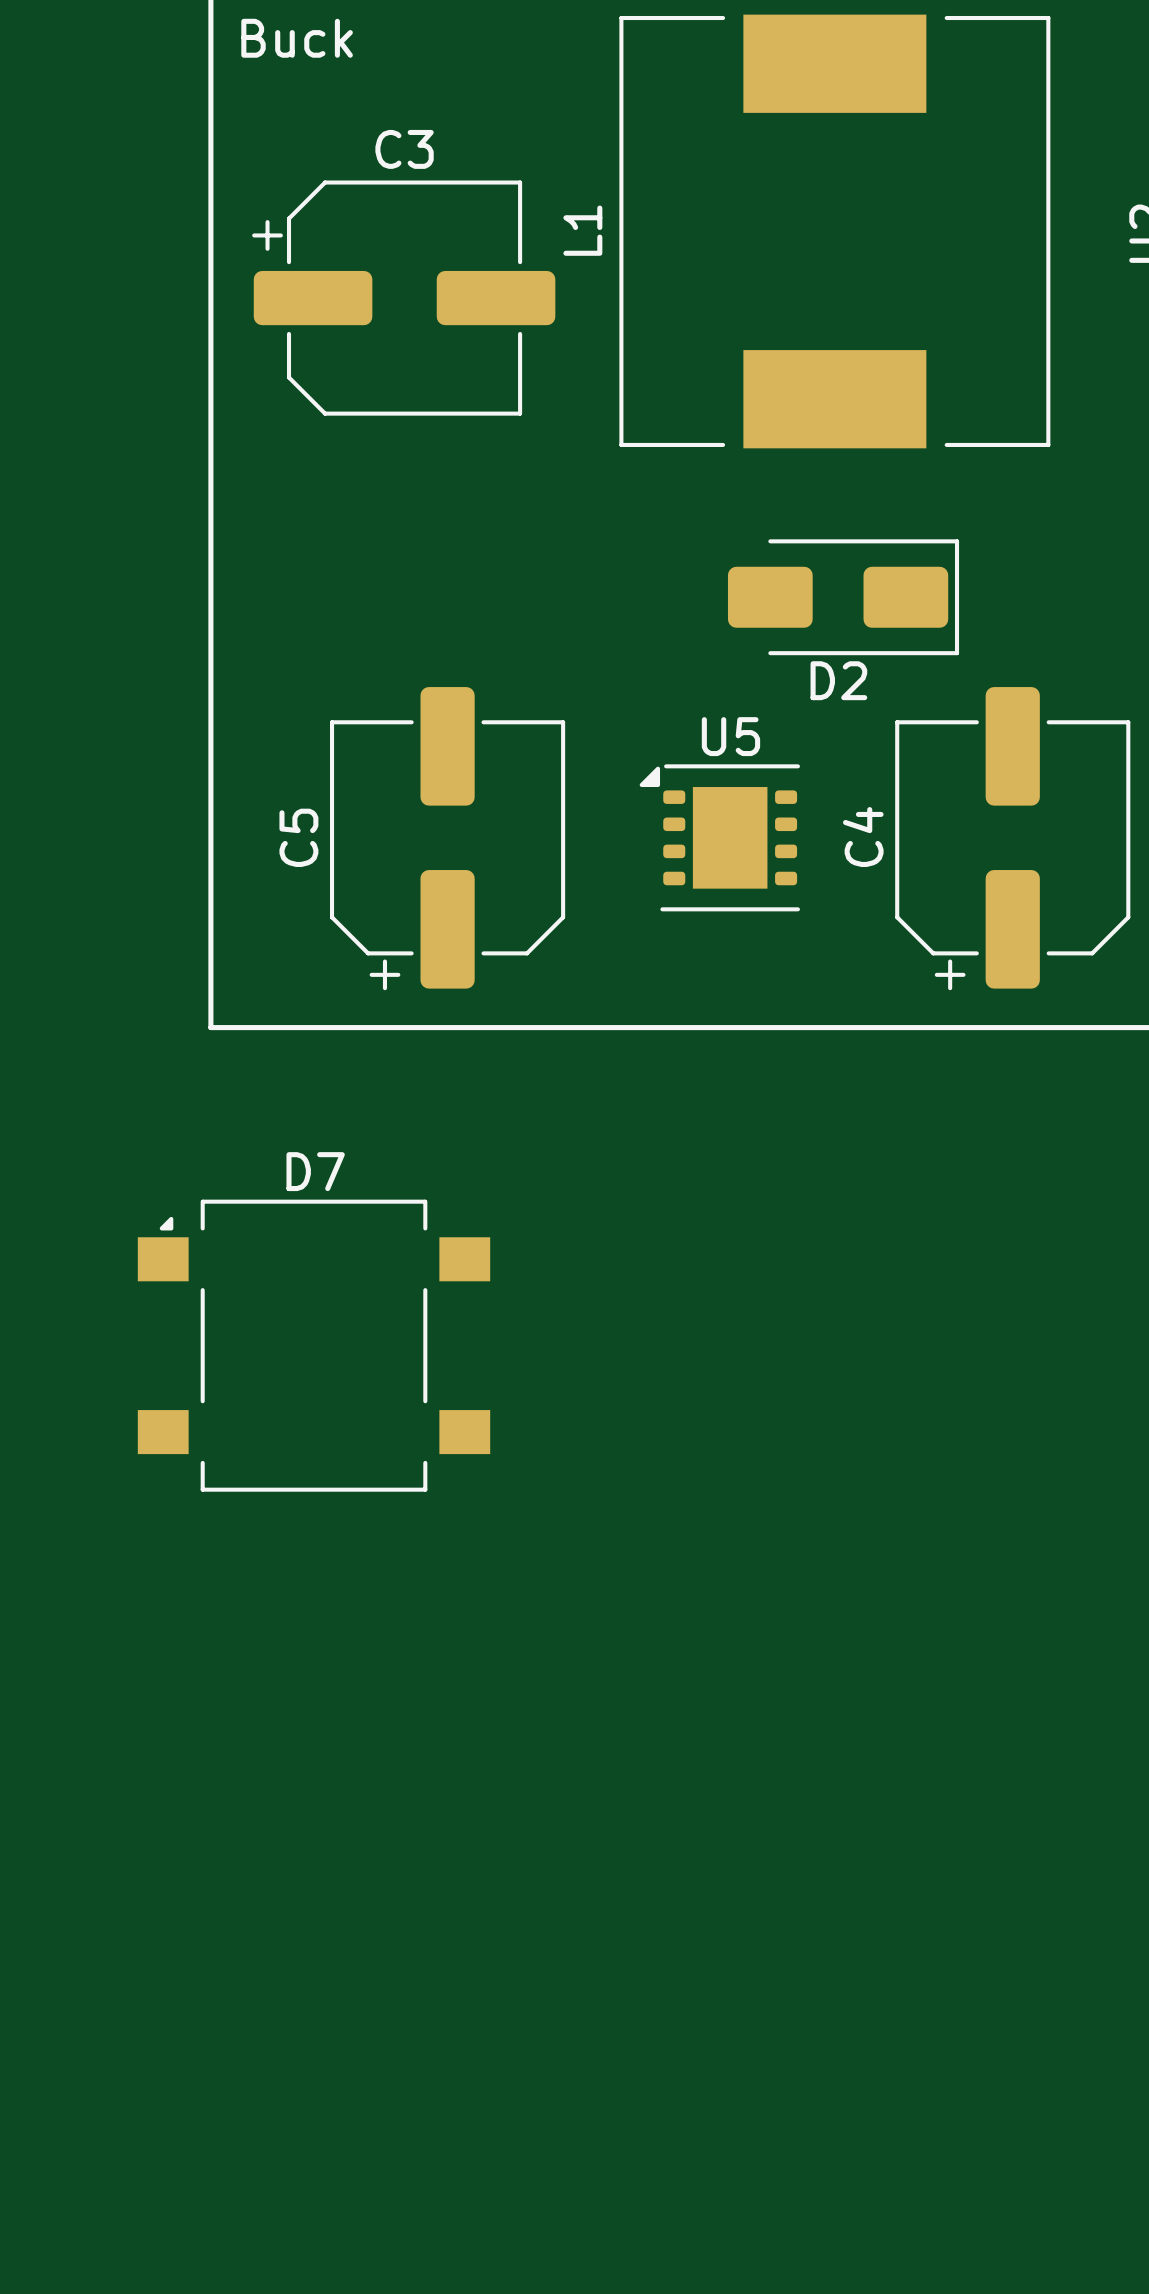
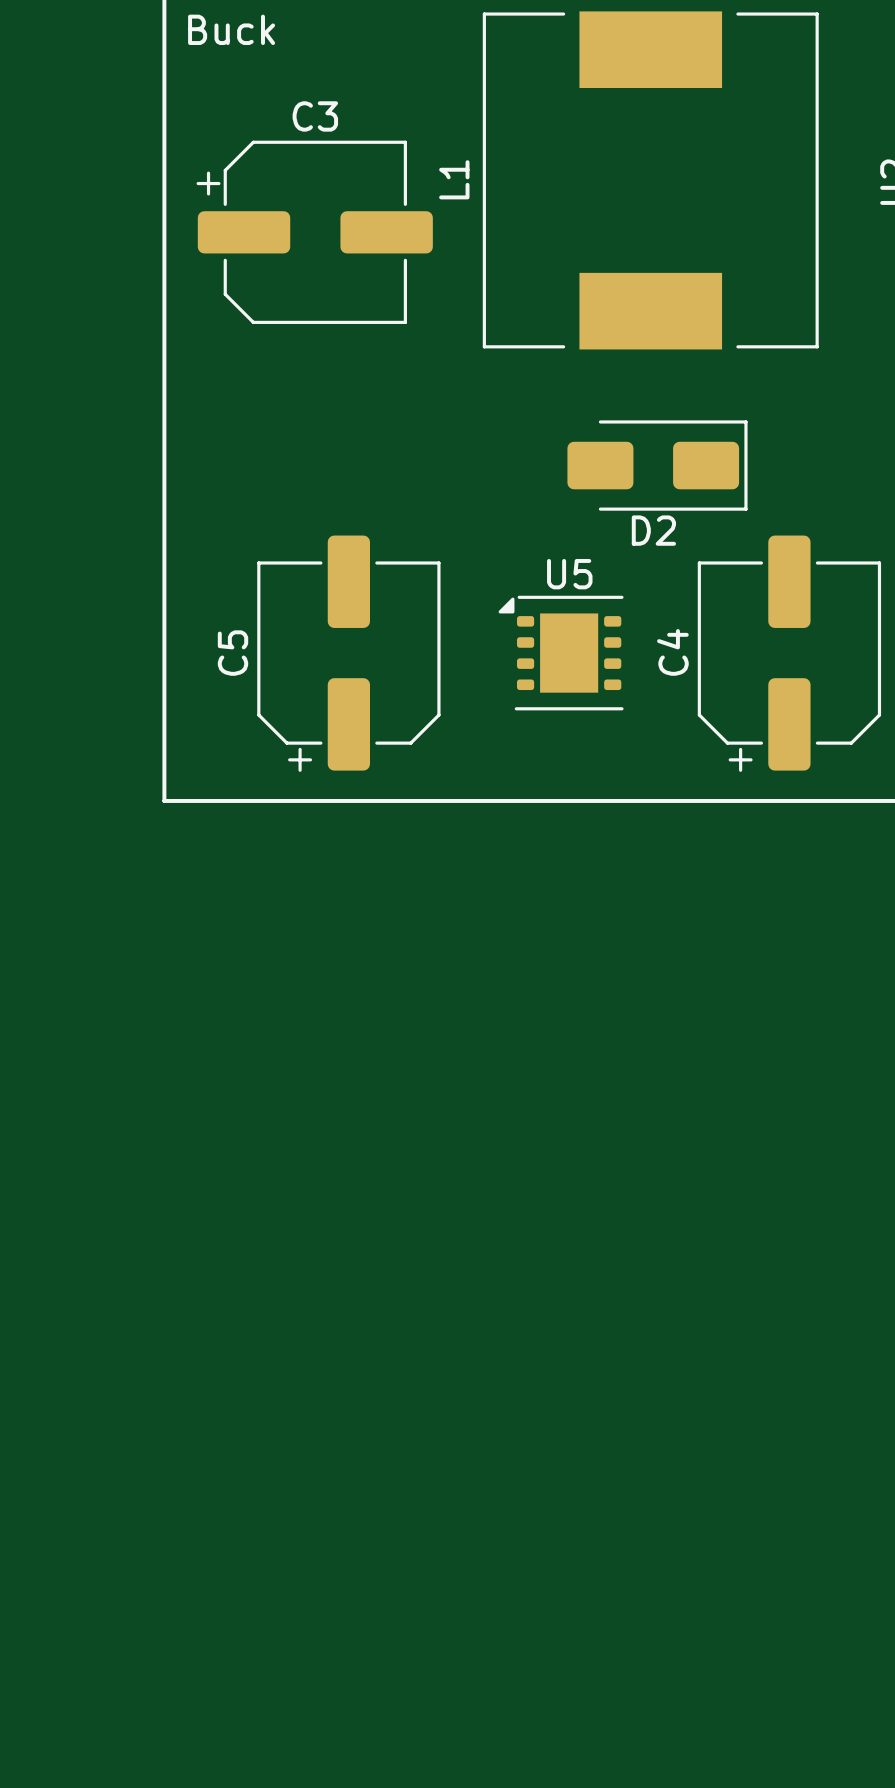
D7: (314, 1345) -> none

